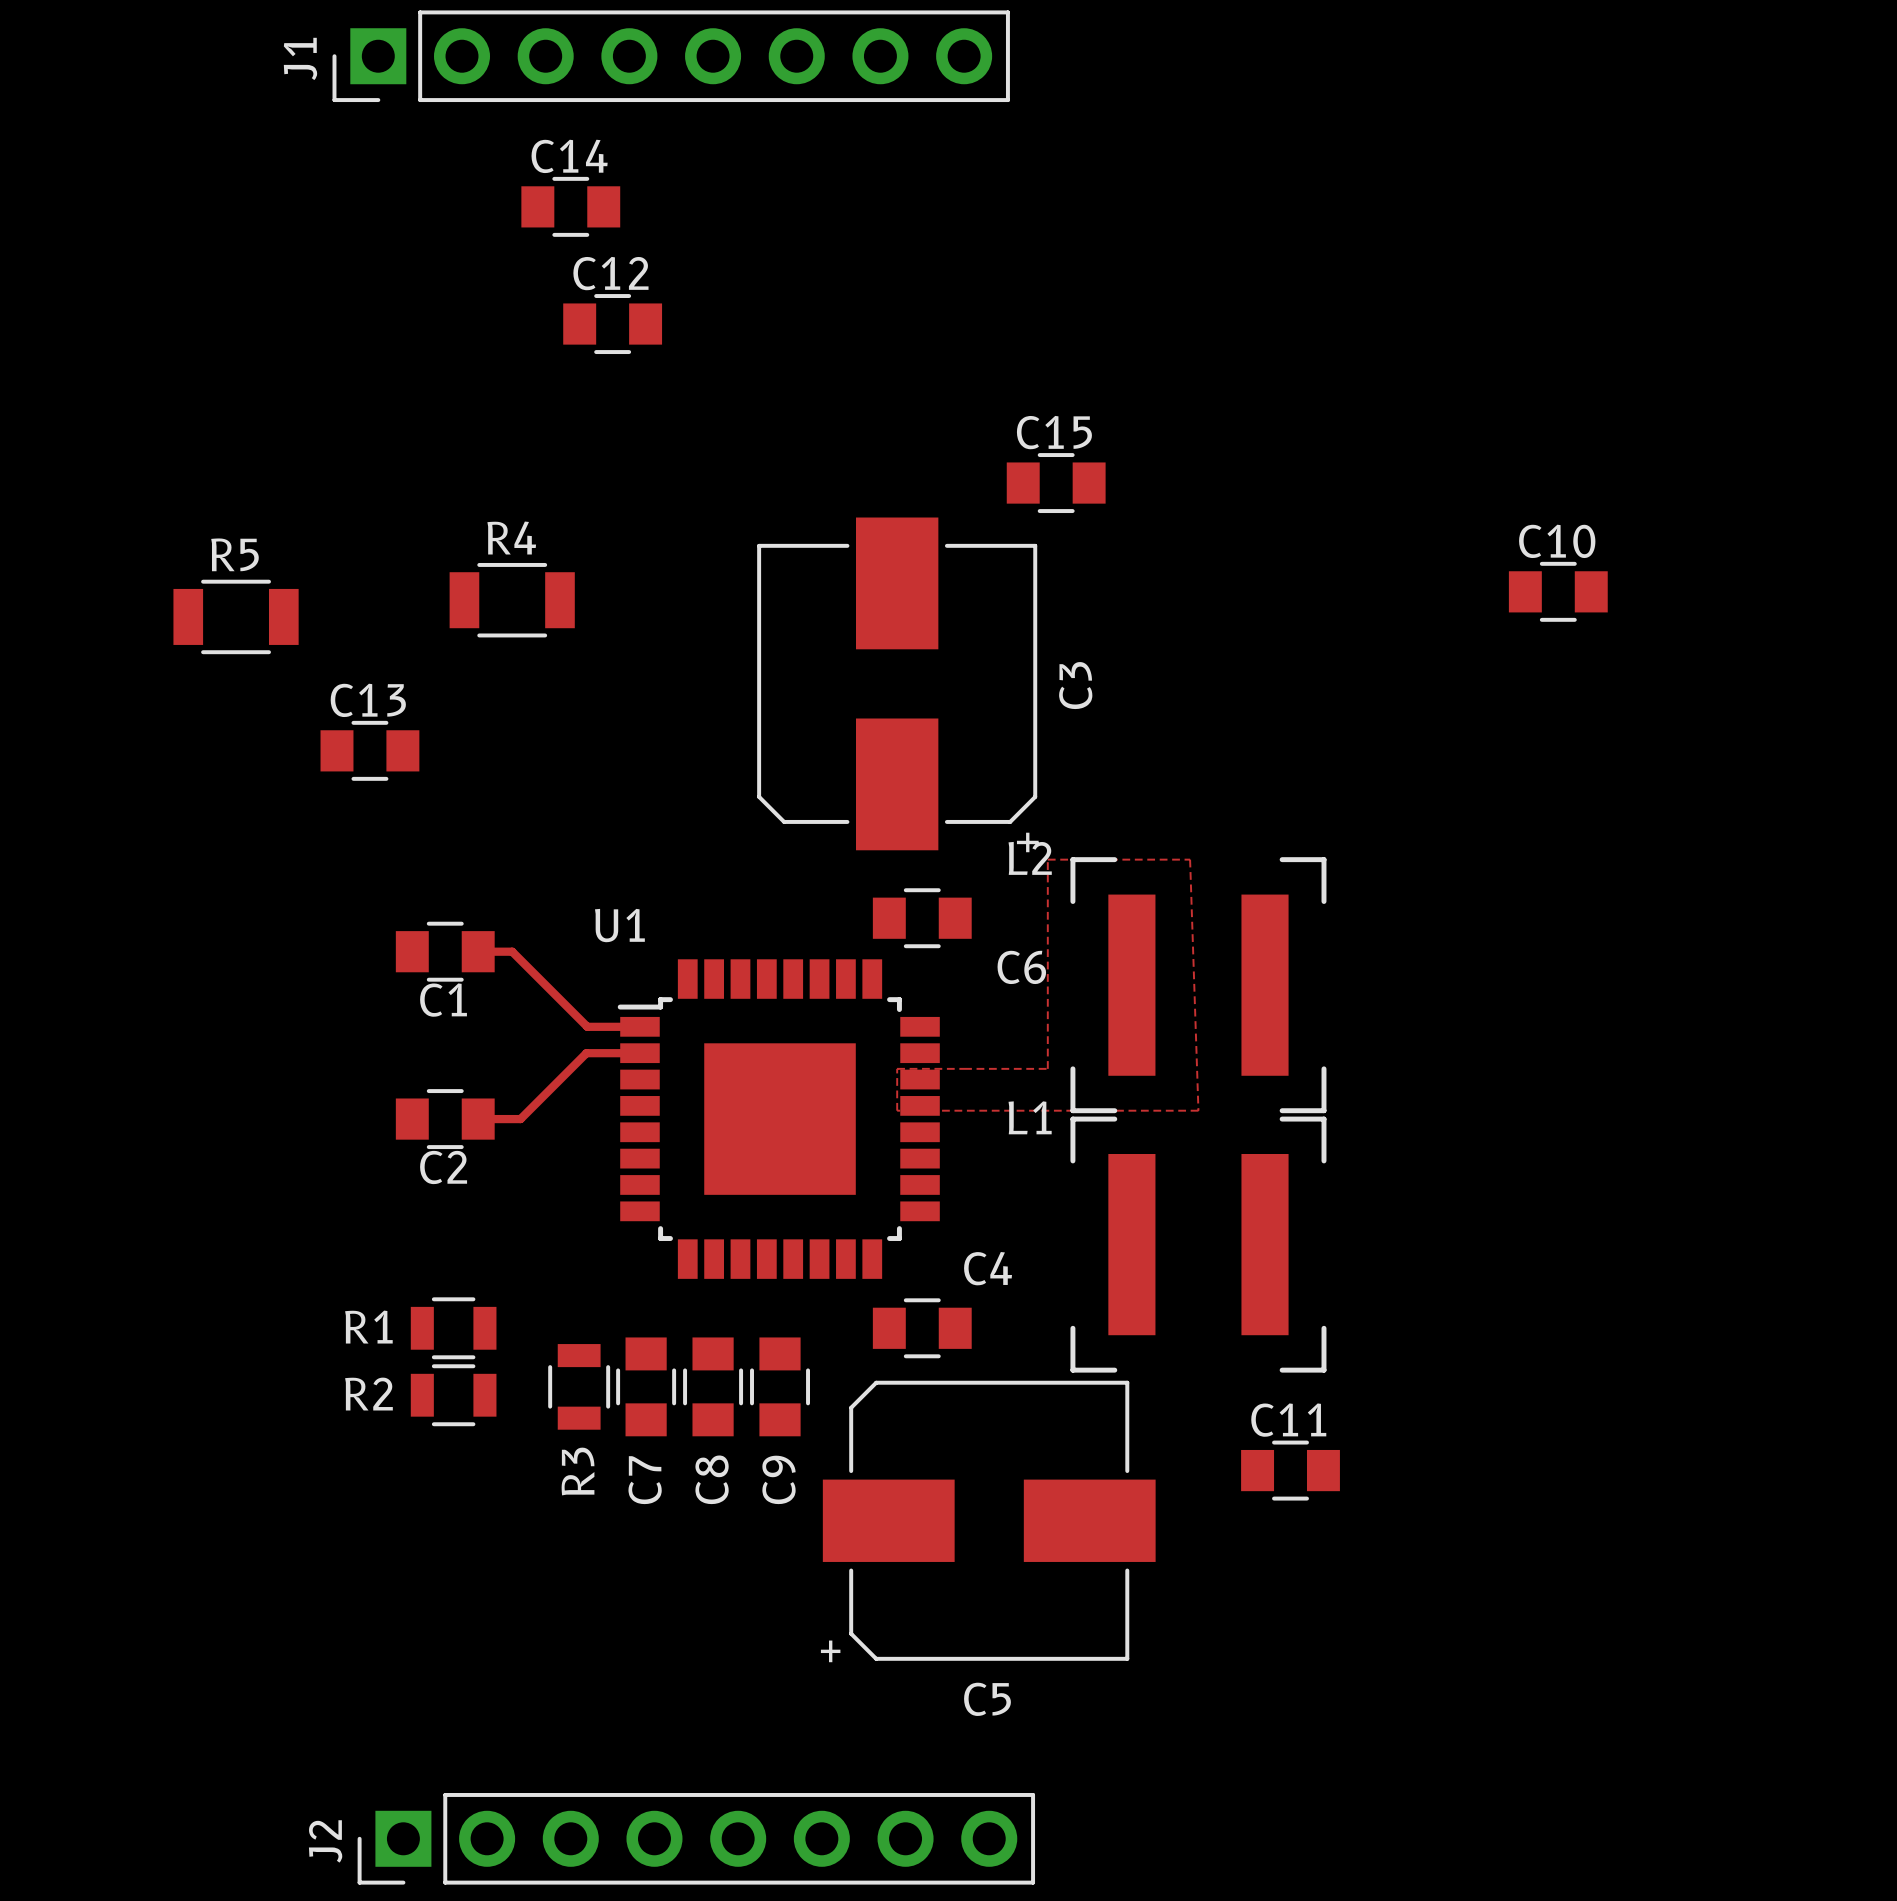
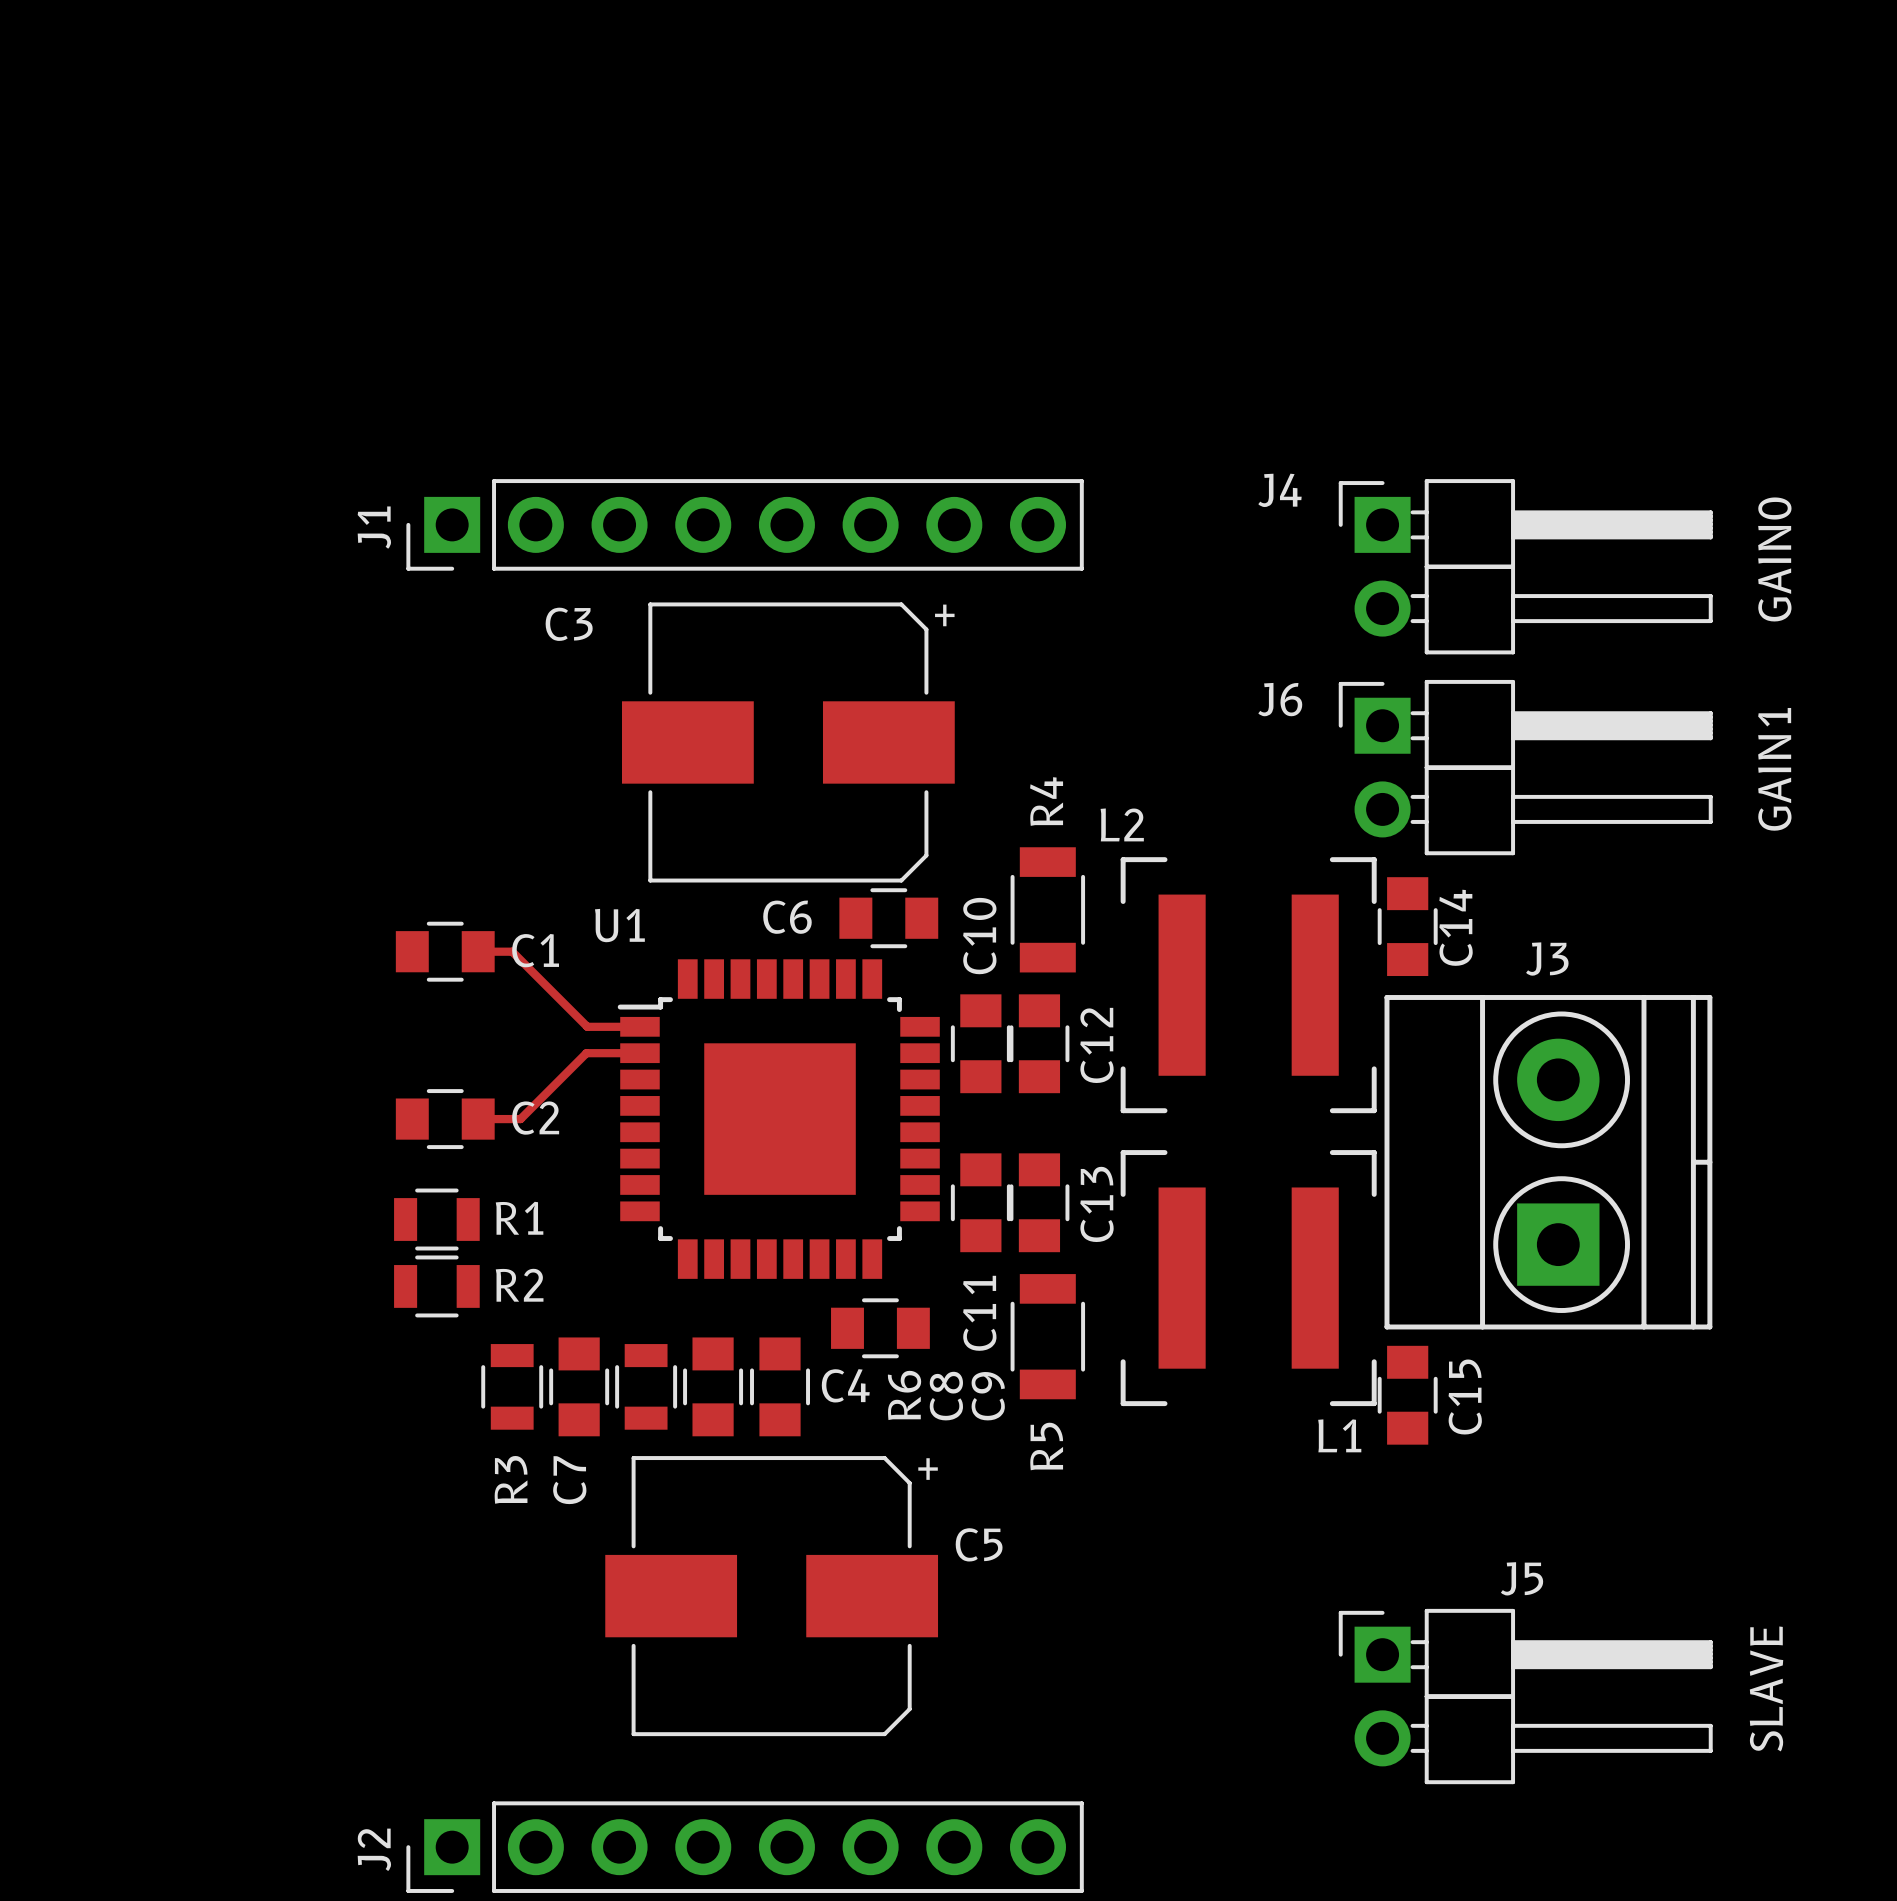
J1 position: (671, 56) -> (745, 524)
C14 rotation: 0° (570, 206) -> 90° clockwise (1407, 926)
C14 position: (570, 206) -> (1407, 926)
C12 rotation: 0° (612, 324) -> 90° clockwise (1039, 1043)
C12 position: (612, 324) -> (1039, 1043)
C15 rotation: 0° (1056, 483) -> 90° clockwise (1407, 1395)
C15 position: (1056, 483) -> (1407, 1395)
R5 name position: R5 (235, 554) -> R5 (1046, 1446)
text: none -> GAIN0 (1774, 559)
J4: none -> (1525, 566)
C10 rotation: 0° (1558, 591) -> 90° clockwise (980, 1043)
C10 position: (1558, 591) -> (980, 1043)
R4 rotation: 0° (512, 600) -> 90° clockwise (1047, 909)
R4 position: (512, 600) -> (1047, 909)
R5 rotation: 0° (236, 616) -> 90° clockwise (1047, 1336)
R5 position: (236, 616) -> (1047, 1336)
C3 rotation: 0° (897, 683) -> 90° counterclockwise (788, 742)
C3 name position: C3 (1075, 685) -> C3 (569, 624)
C13 rotation: 0° (369, 750) -> 90° clockwise (1039, 1202)
C13 position: (369, 750) -> (1039, 1202)
J6: none -> (1525, 767)
text: none -> GAIN1 (1774, 769)
L2 name position: L2 (1030, 858) -> L2 (1122, 824)
top zone outline: (1047, 859) (1047, 1068) (897, 1068) (897, 1110) (1198, 1110) (1190, 859) (1047, 859) -> none
C6 position: (922, 918) -> (888, 918)
C6 name position: C6 (1021, 967) -> C6 (787, 917)
L2 position: (1198, 985) -> (1248, 985)
C1 name position: C1 (443, 1000) -> C1 (535, 950)
L1 name position: L1 (1030, 1117) -> L1 (1339, 1435)
J3: none -> (1548, 1162)
C2 name position: C2 (443, 1167) -> C2 (535, 1118)
L1 position: (1198, 1244) -> (1248, 1278)
C4 name position: C4 (988, 1268) -> C4 (845, 1385)
R1 name position: R1 (368, 1327) -> R1 (519, 1218)
R1 position: (453, 1328) -> (436, 1219)
C4 position: (922, 1328) -> (880, 1328)
R3 position: (579, 1386) -> (512, 1386)
C7 position: (646, 1386) -> (579, 1386)
R6: none -> (646, 1386)
R2 name position: R2 (368, 1394) -> R2 (519, 1285)
R2 position: (453, 1395) -> (436, 1286)
C11 name position: C11 (1288, 1420) -> C11 (979, 1313)
C11 rotation: 0° (1290, 1470) -> 90° clockwise (980, 1202)
C11 position: (1290, 1470) -> (980, 1202)
R3 name position: R3 (578, 1471) -> R3 (511, 1479)
C8 name position: C8 (712, 1479) -> C8 (946, 1396)
C9 name position: C9 (779, 1479) -> C9 (988, 1396)
C7 name position: C7 (645, 1480) -> C7 (569, 1480)
C5 rotation: 0° (989, 1520) -> 180° (771, 1596)
C5 position: (989, 1520) -> (771, 1596)
text: none -> SLAVE (1766, 1688)
J5: none -> (1525, 1696)
C5 name position: C5 (987, 1699) -> C5 (979, 1544)
J2 position: (696, 1838) -> (745, 1847)

